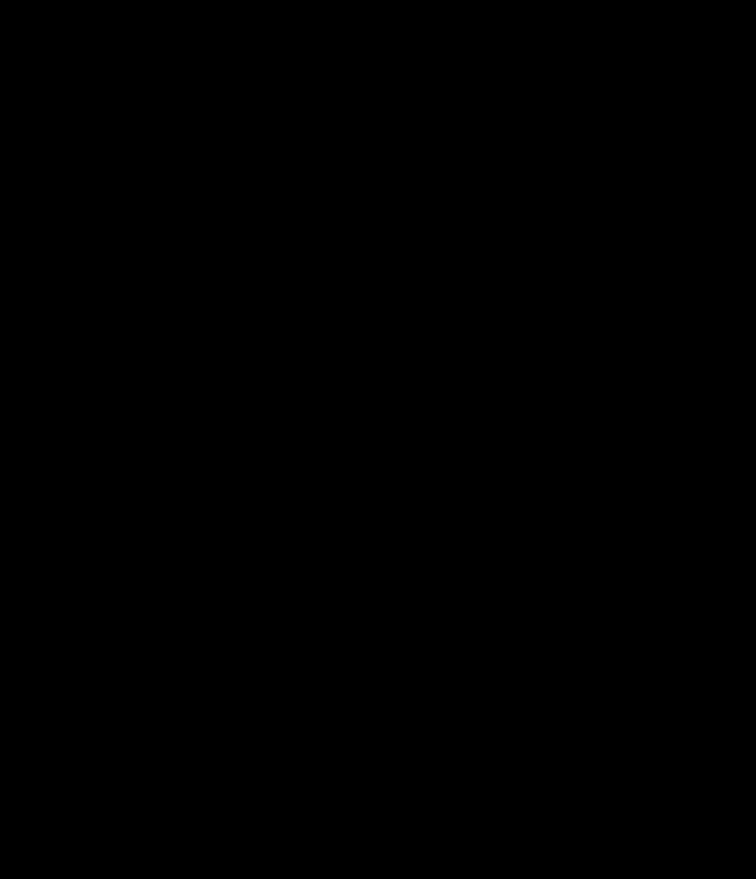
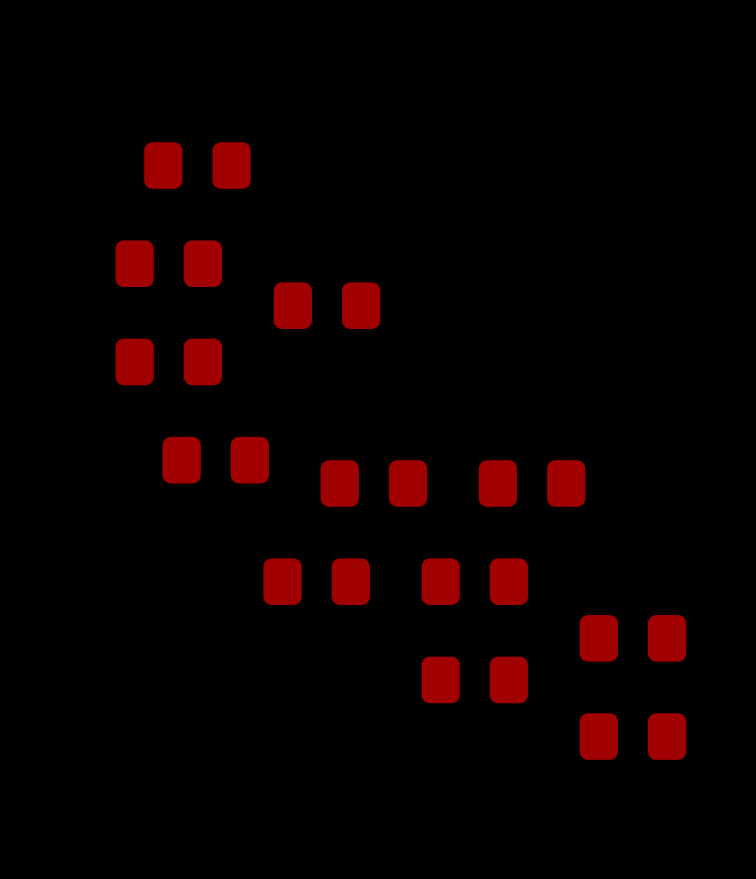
part: none -> (197, 165)
part: none -> (168, 263)
part: none -> (326, 305)
part: none -> (168, 361)
part: none -> (215, 460)
part: none -> (373, 483)
part: none -> (532, 483)
part: none -> (316, 581)
part: none -> (474, 581)
part: none -> (632, 638)
part: none -> (474, 679)
part: none -> (632, 736)

